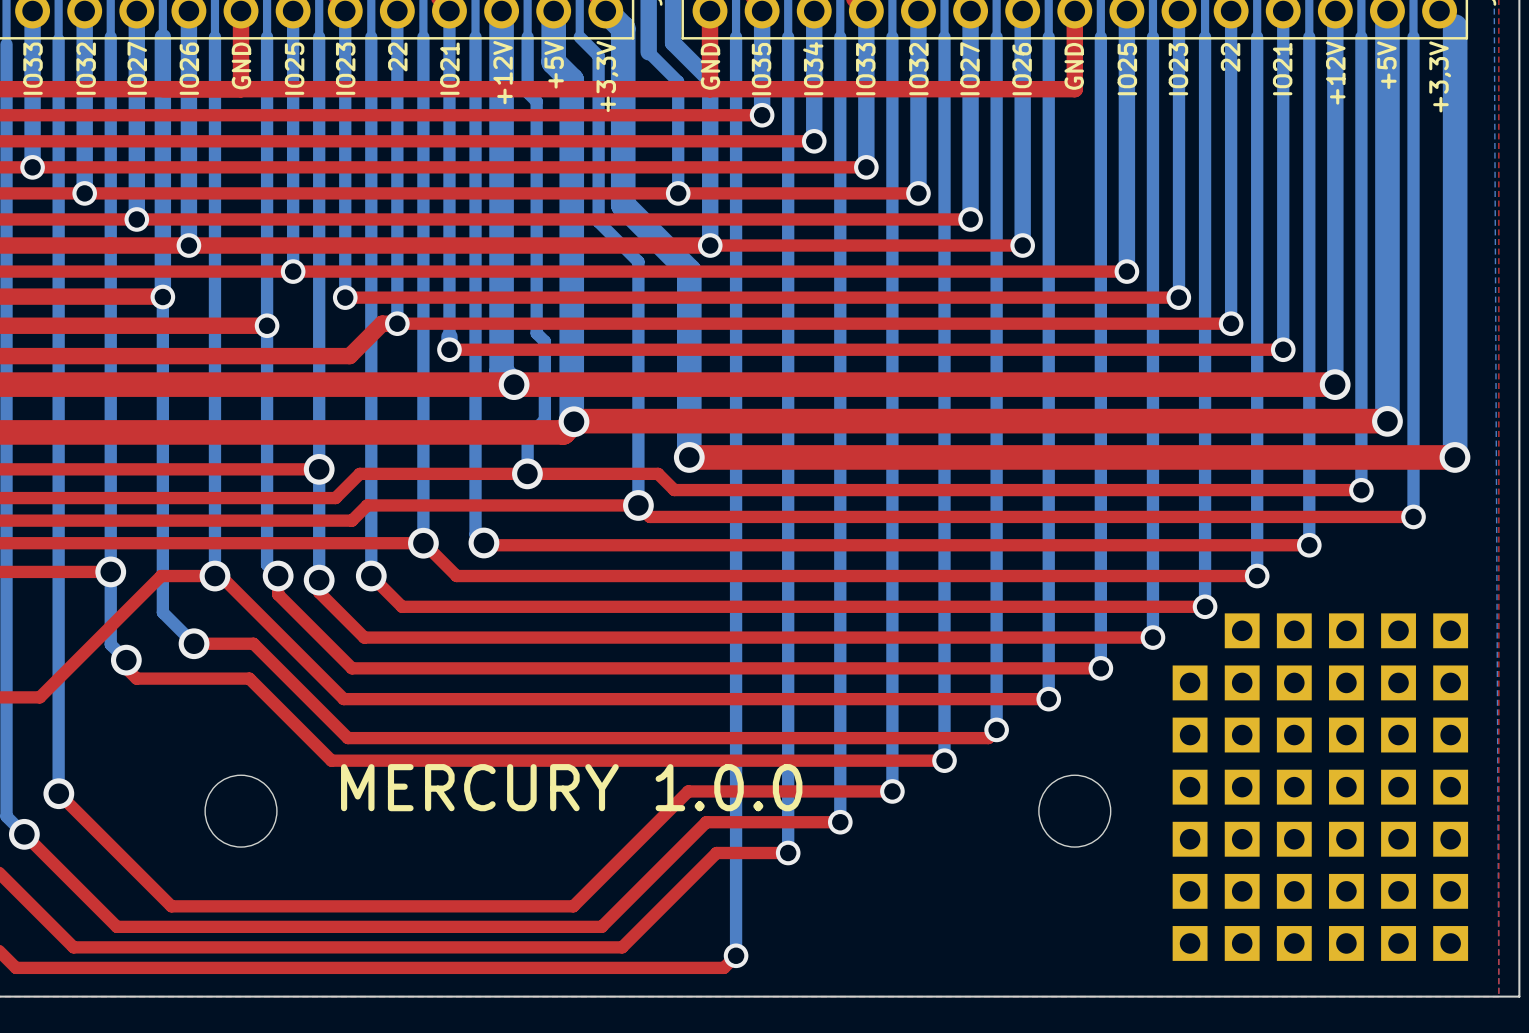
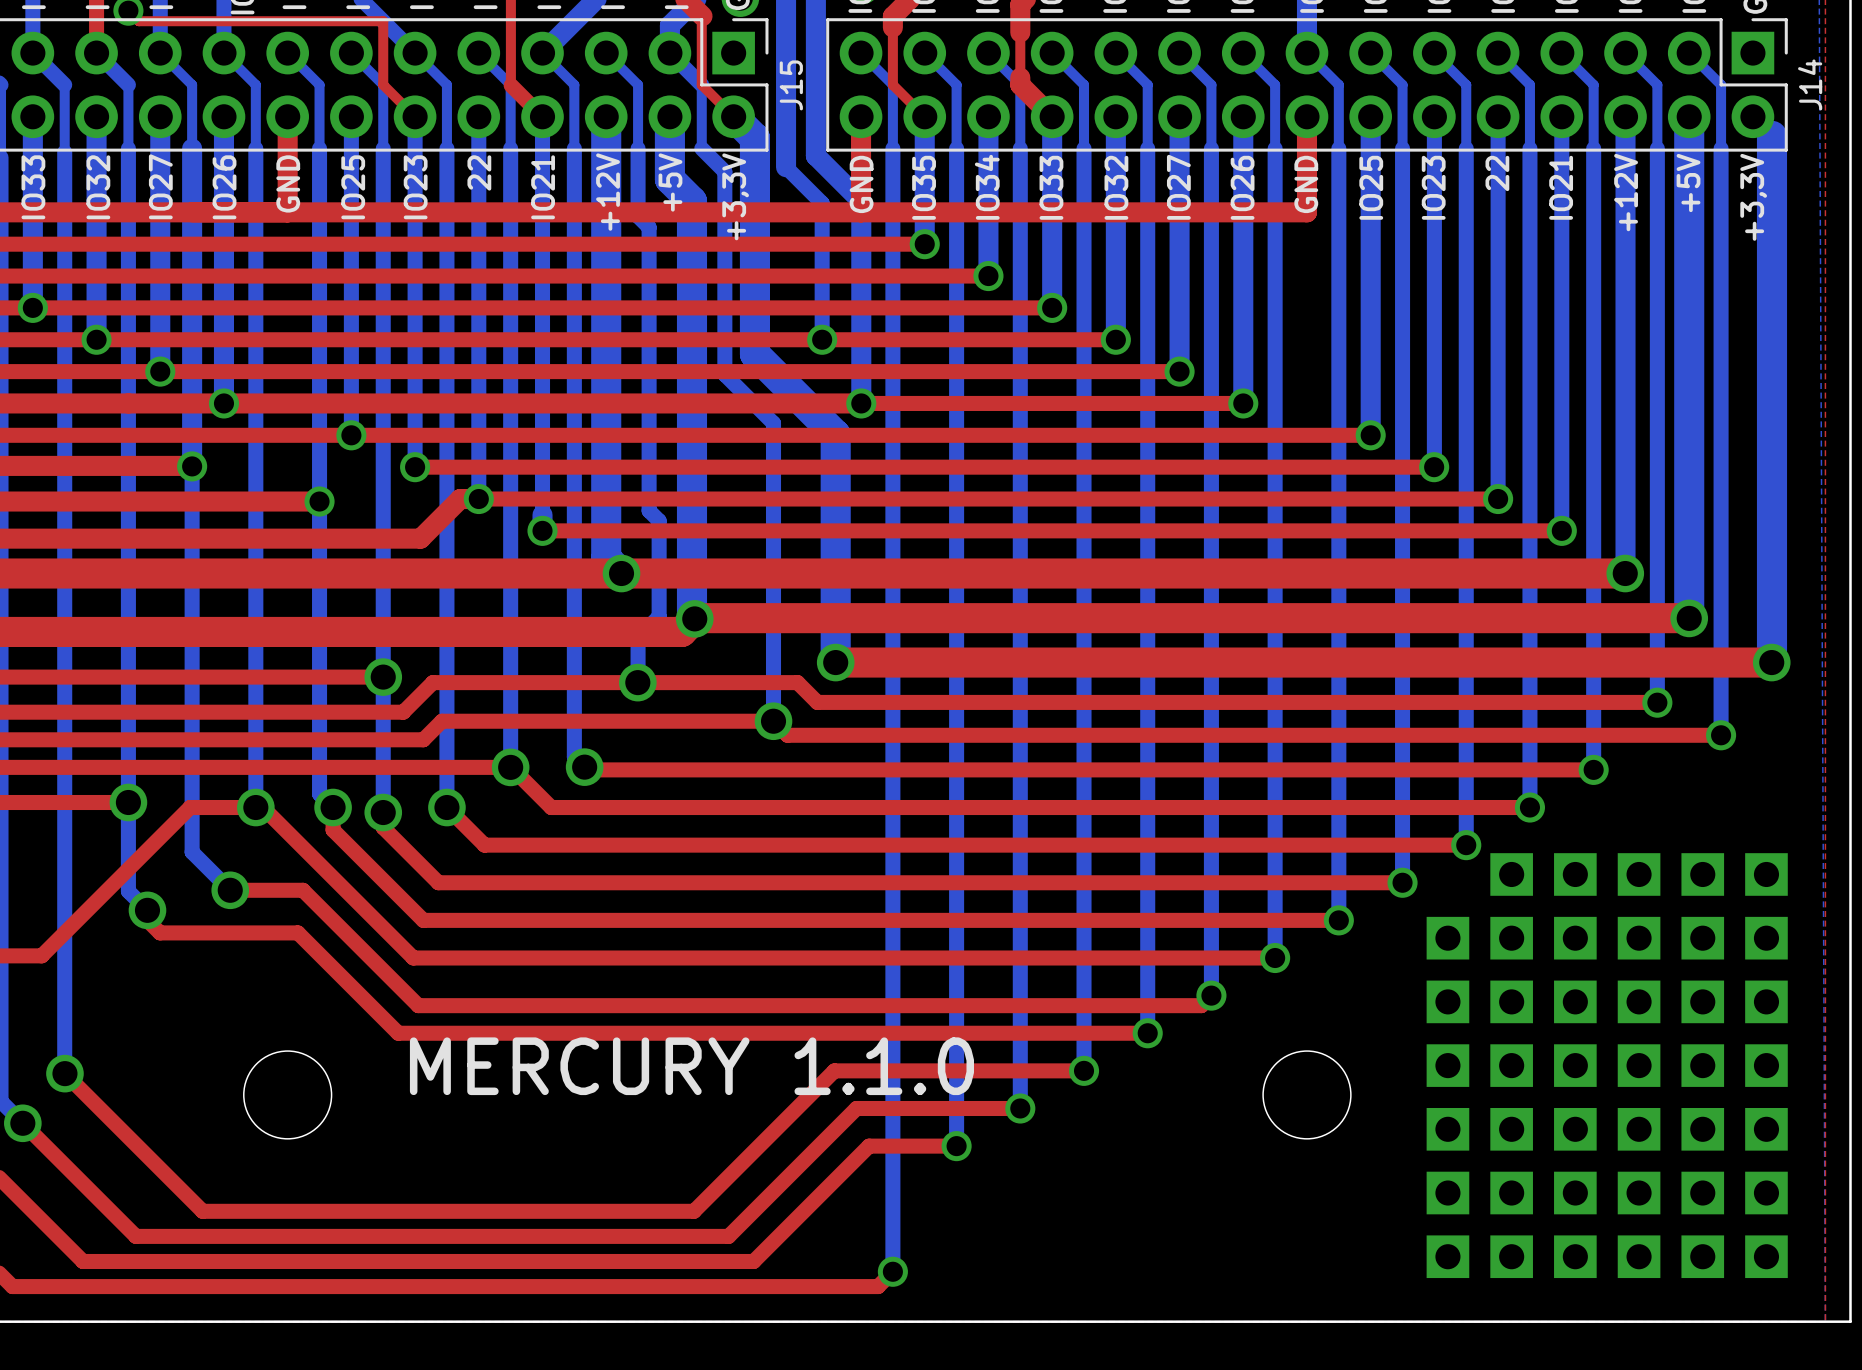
text: MERCURY 1.0.0 (571, 787) -> MERCURY 1.1.0 (691, 1066)

